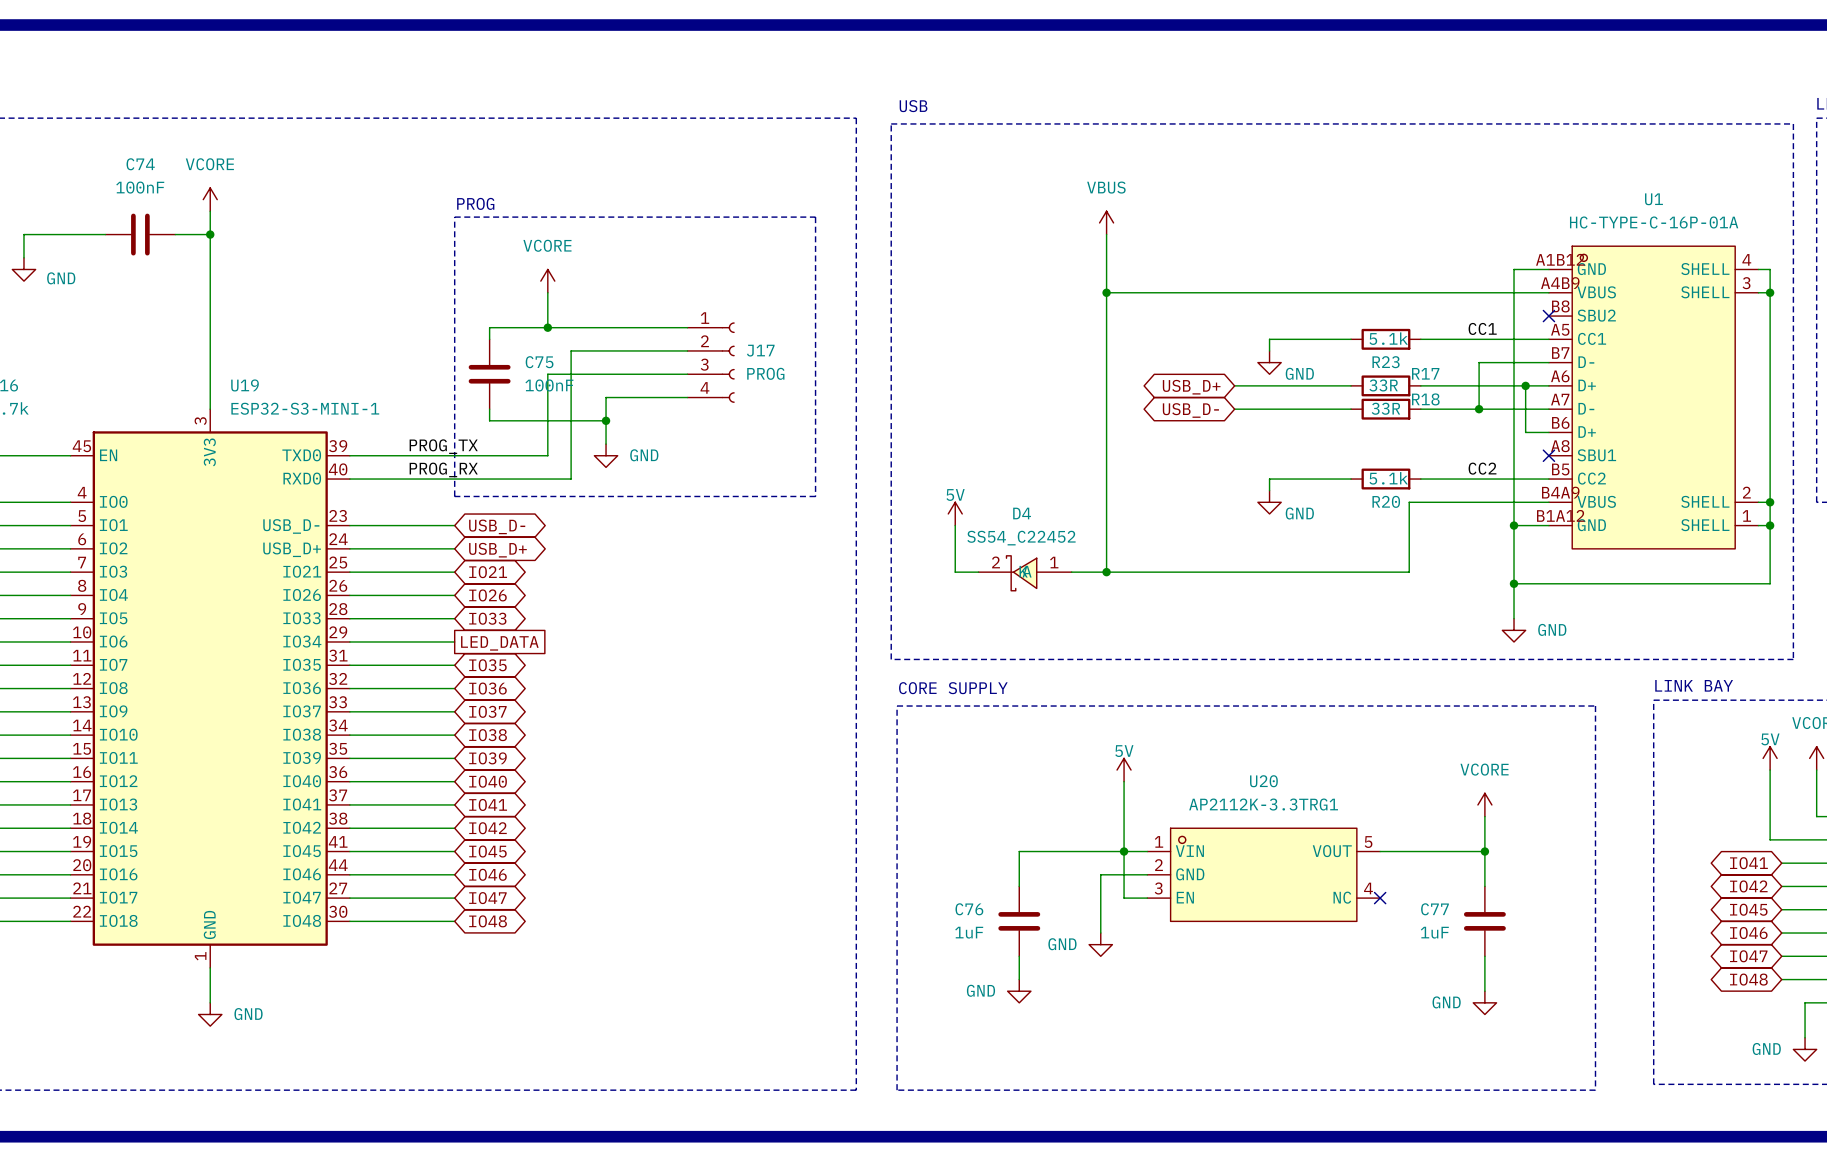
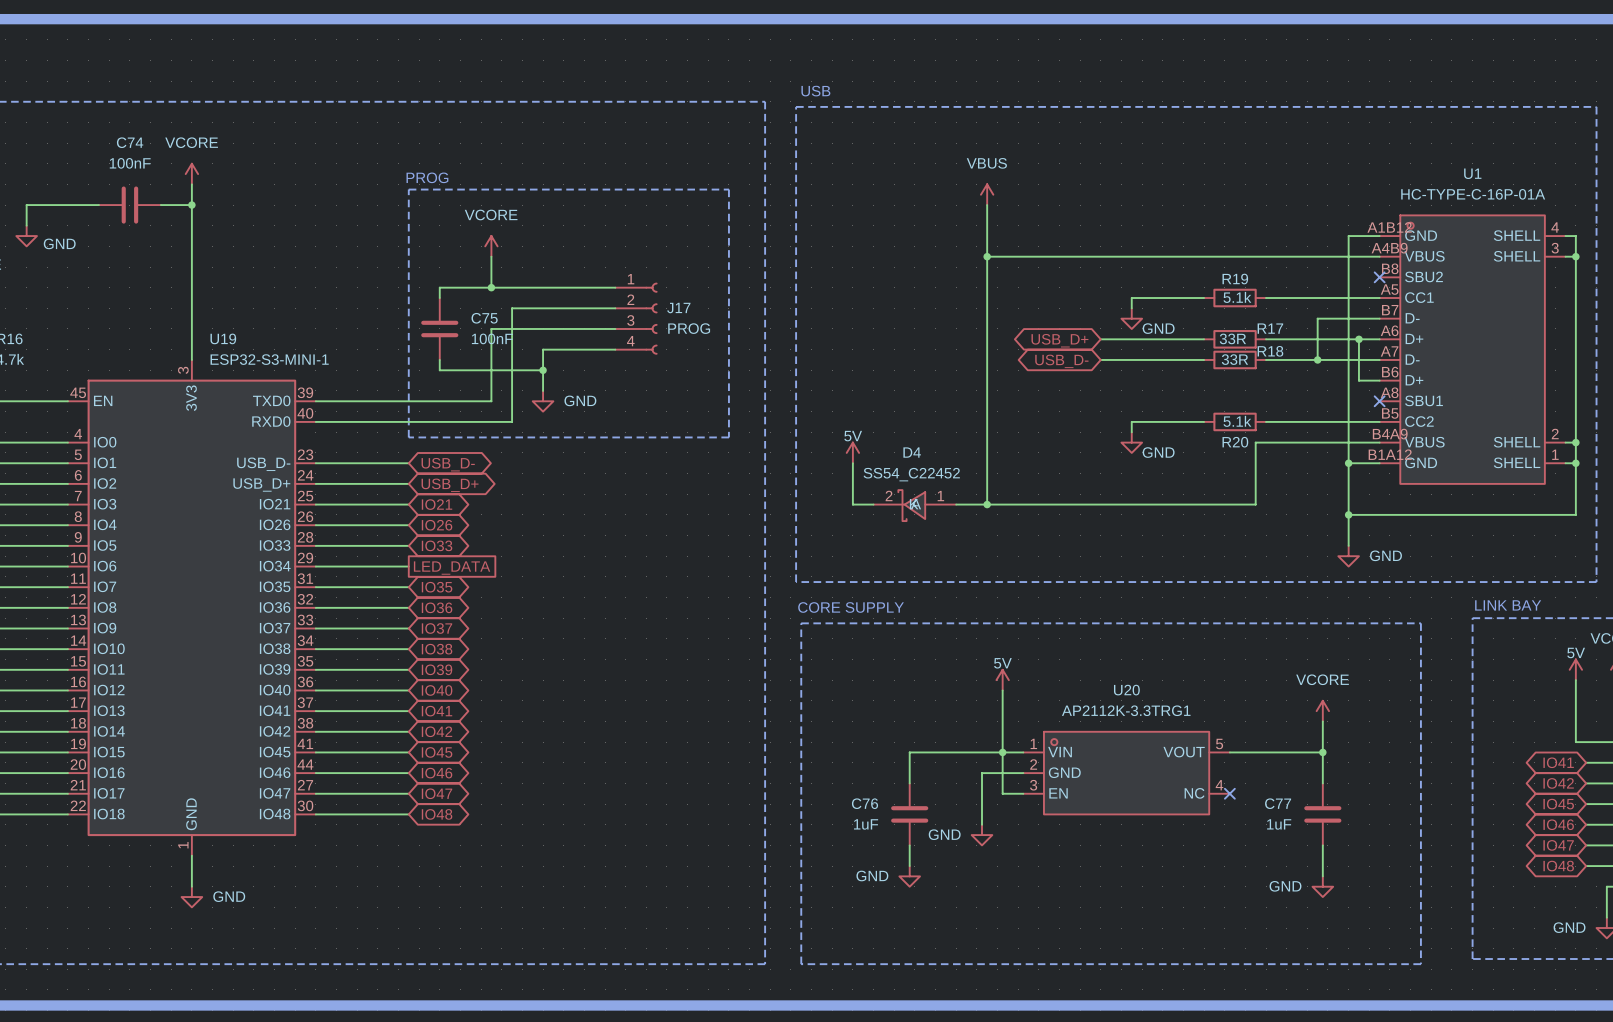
label: CC1 (1482, 328) -> none
R23 name: R23 (1386, 362) -> R19 (1235, 279)
label: PROG_TX (443, 446) -> none
label: CC2 (1482, 468) -> none
label: PROG_RX (443, 469) -> none

